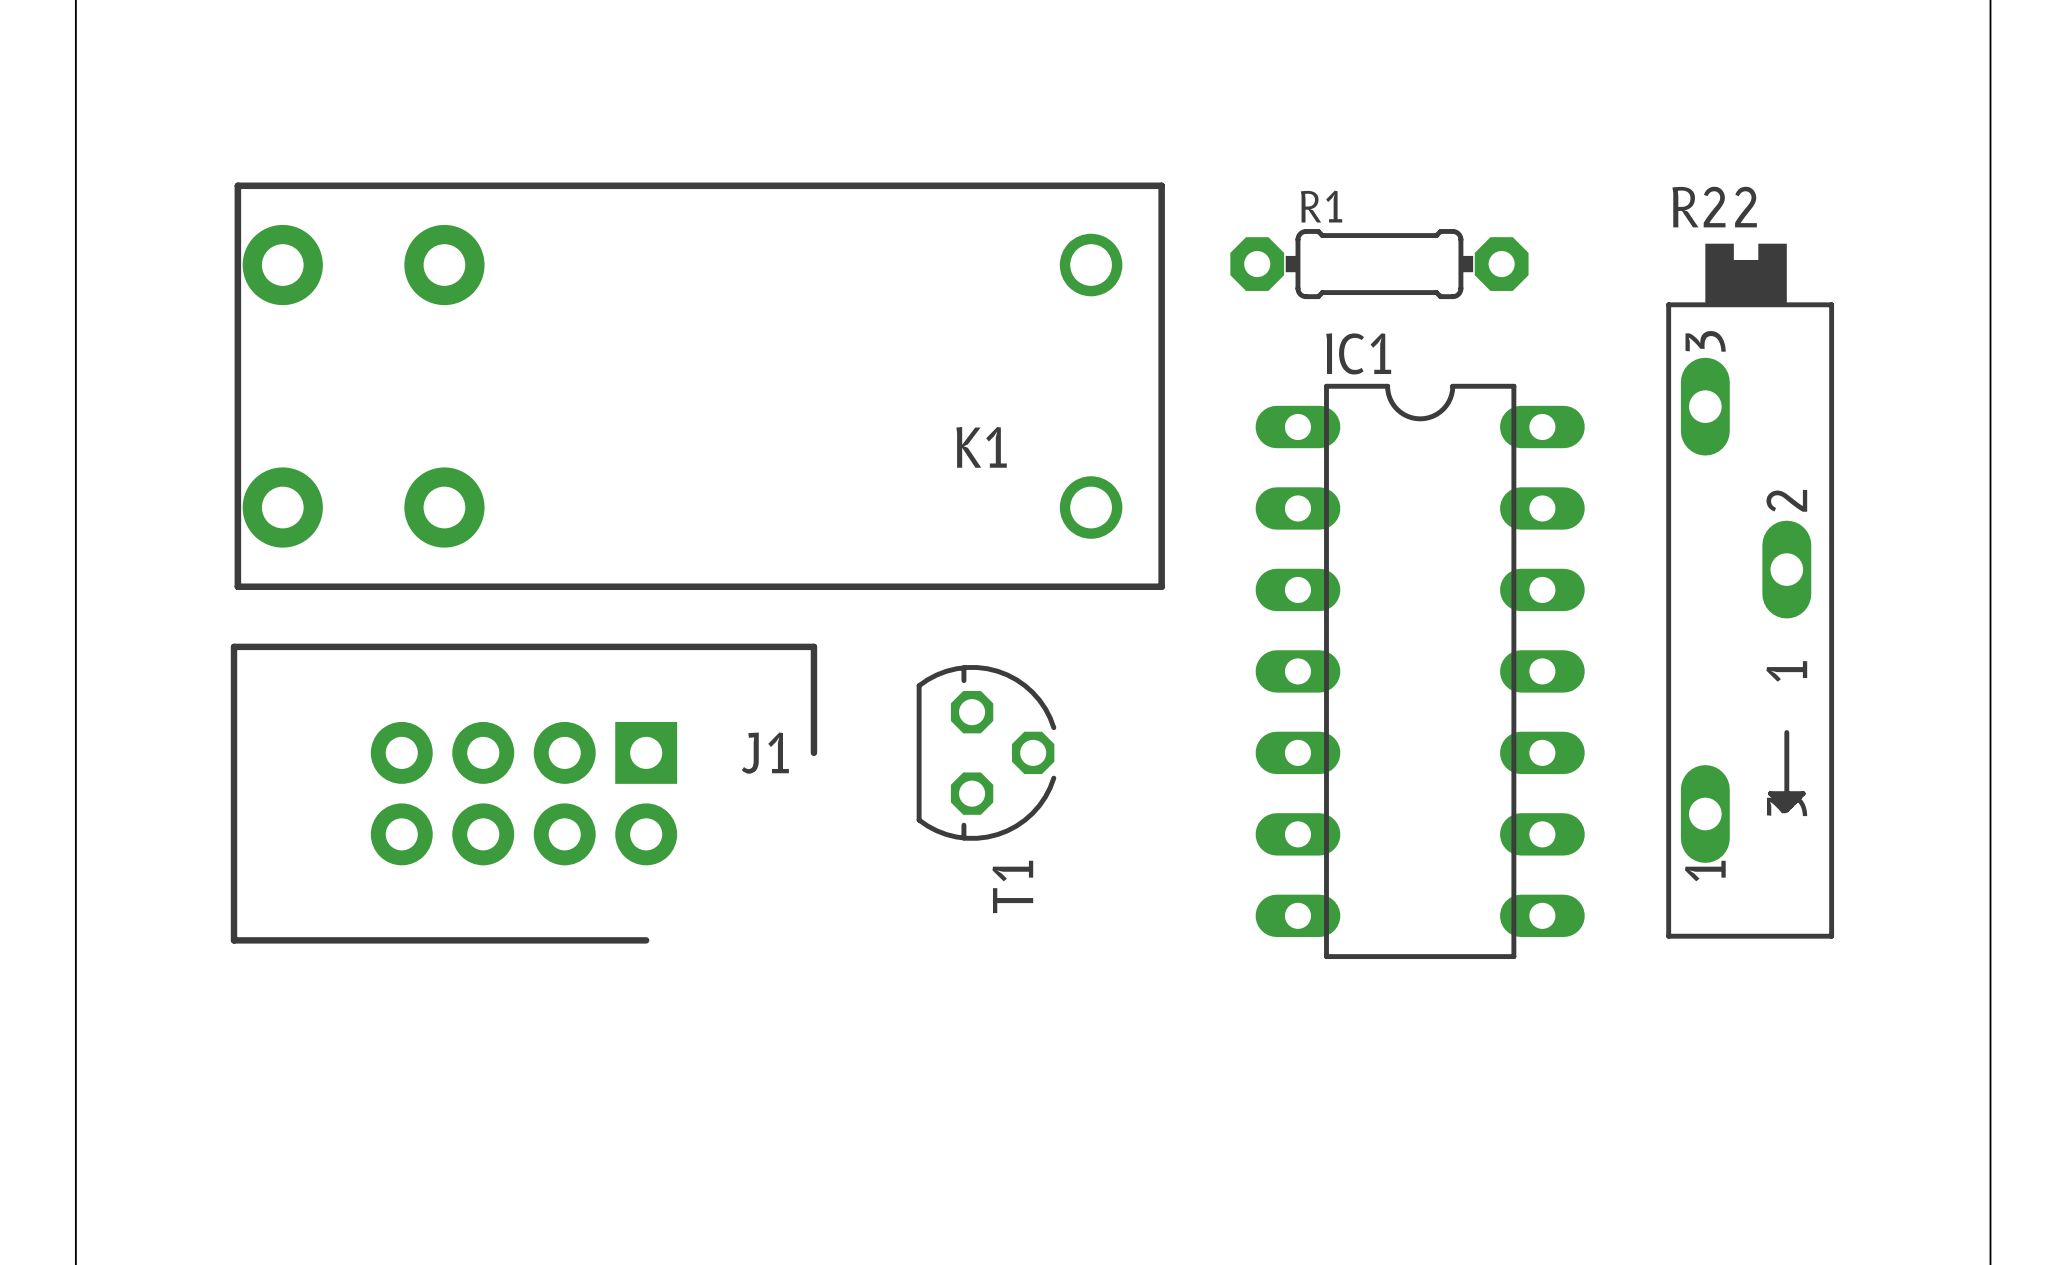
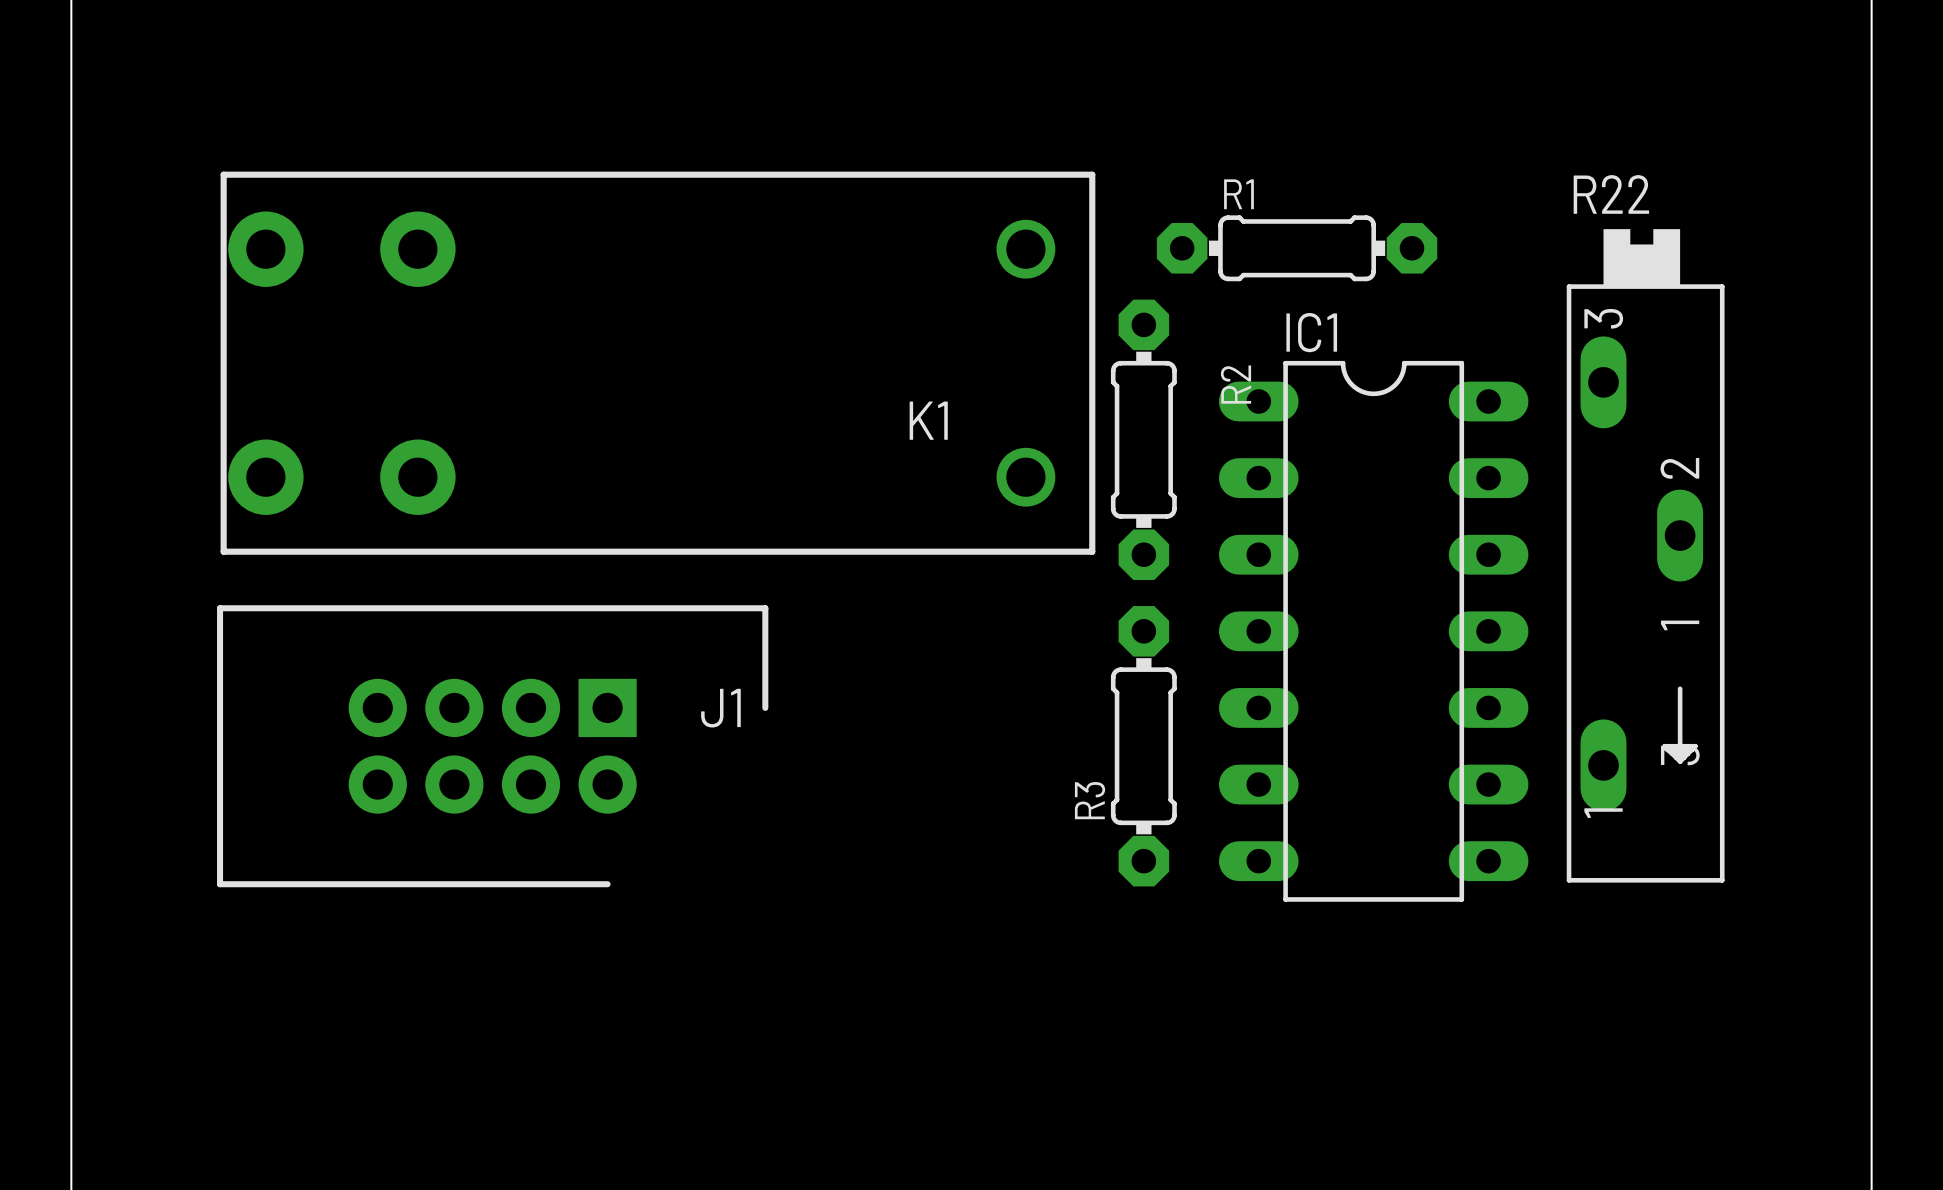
R2: none -> (1143, 439)
IC1 position: (1420, 671) -> (1373, 631)
T1: (986, 752) -> none
R3: none -> (1143, 746)

